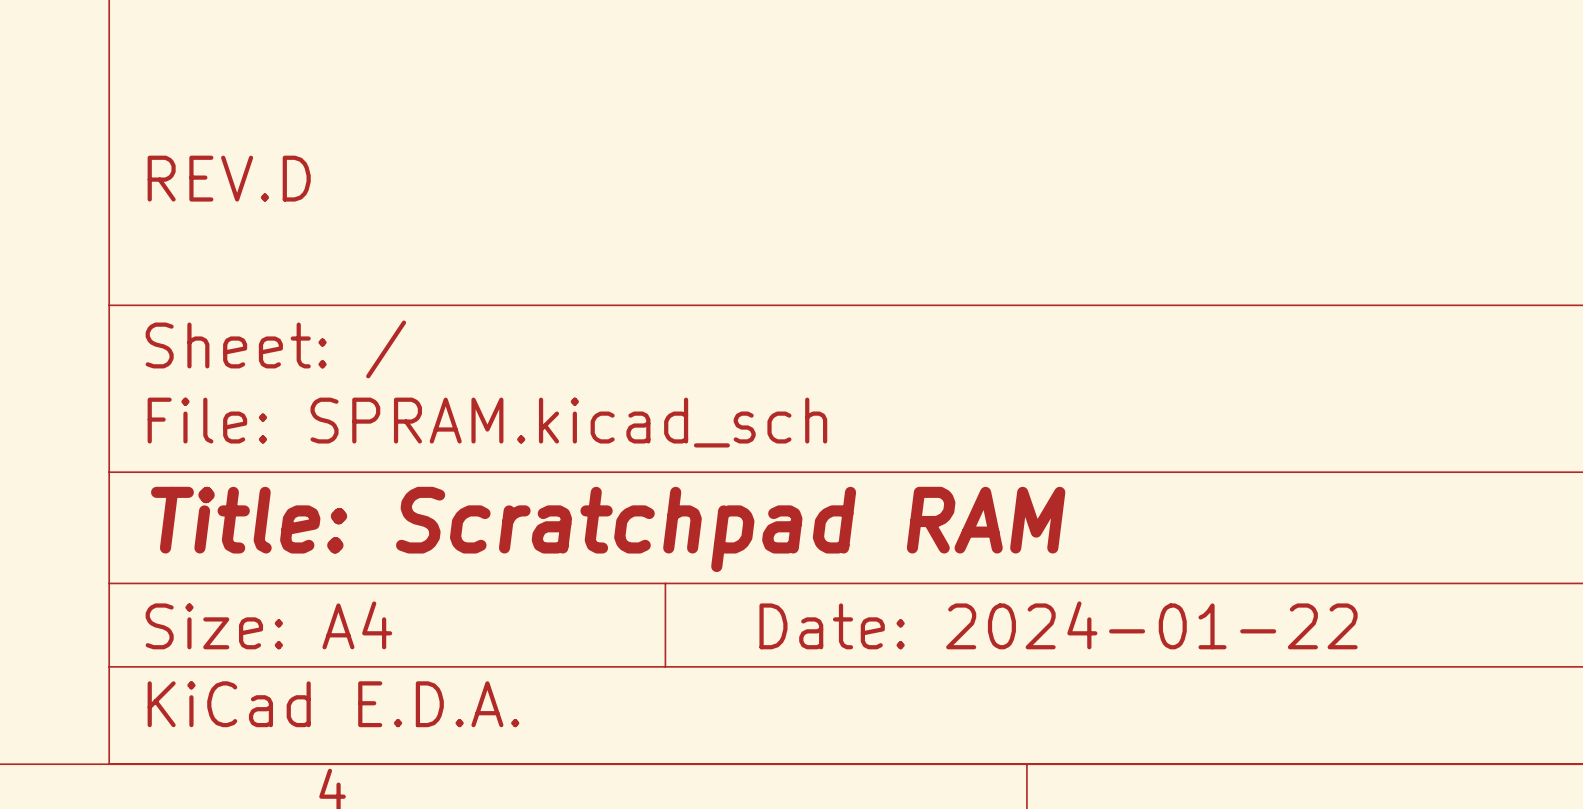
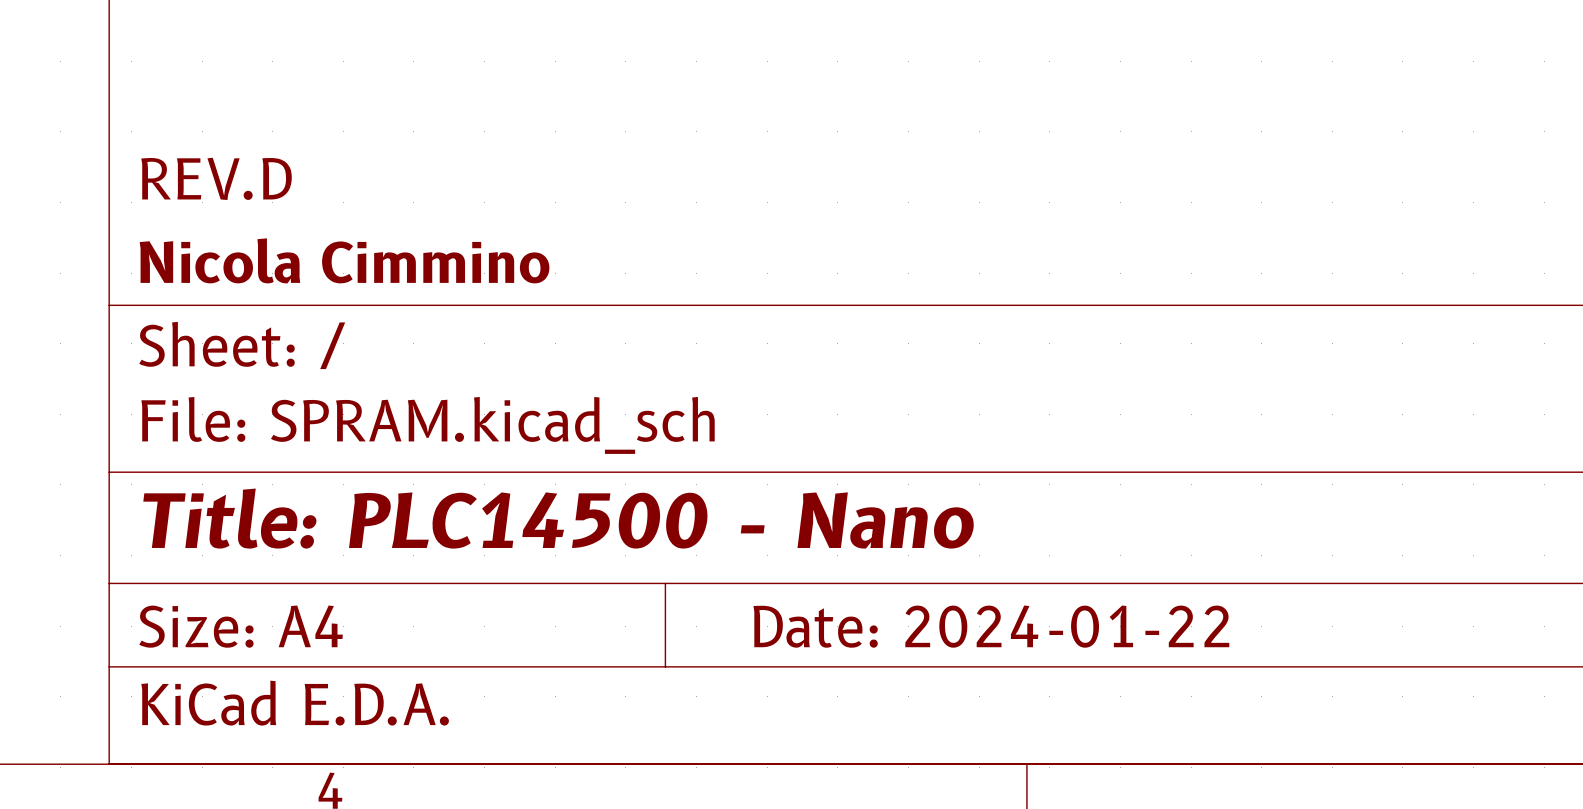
title block: none -> Nicola Cimmino (344, 260)
title block: Title: Scratchpad RAM (608, 529) -> Title: PLC14500 - Nano (558, 518)

